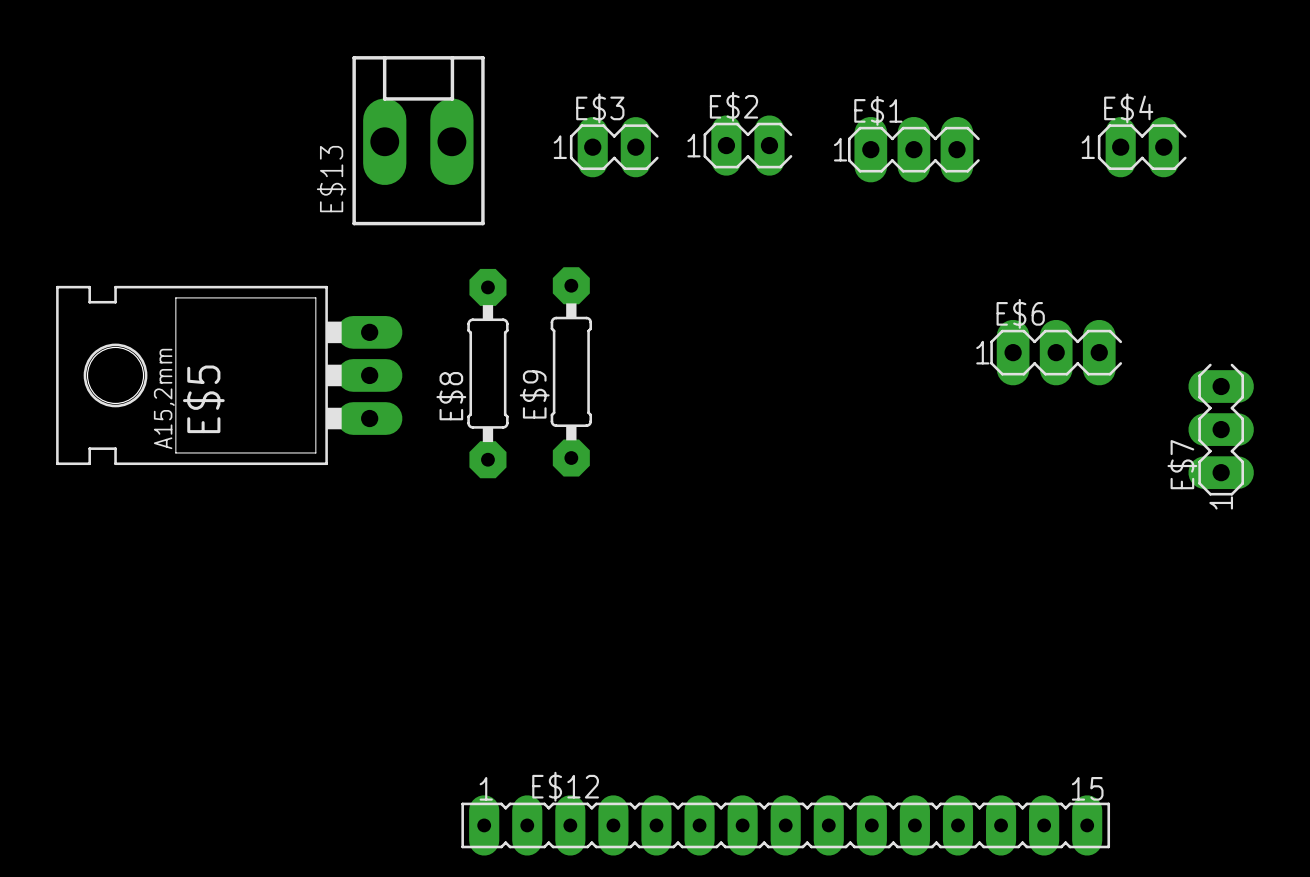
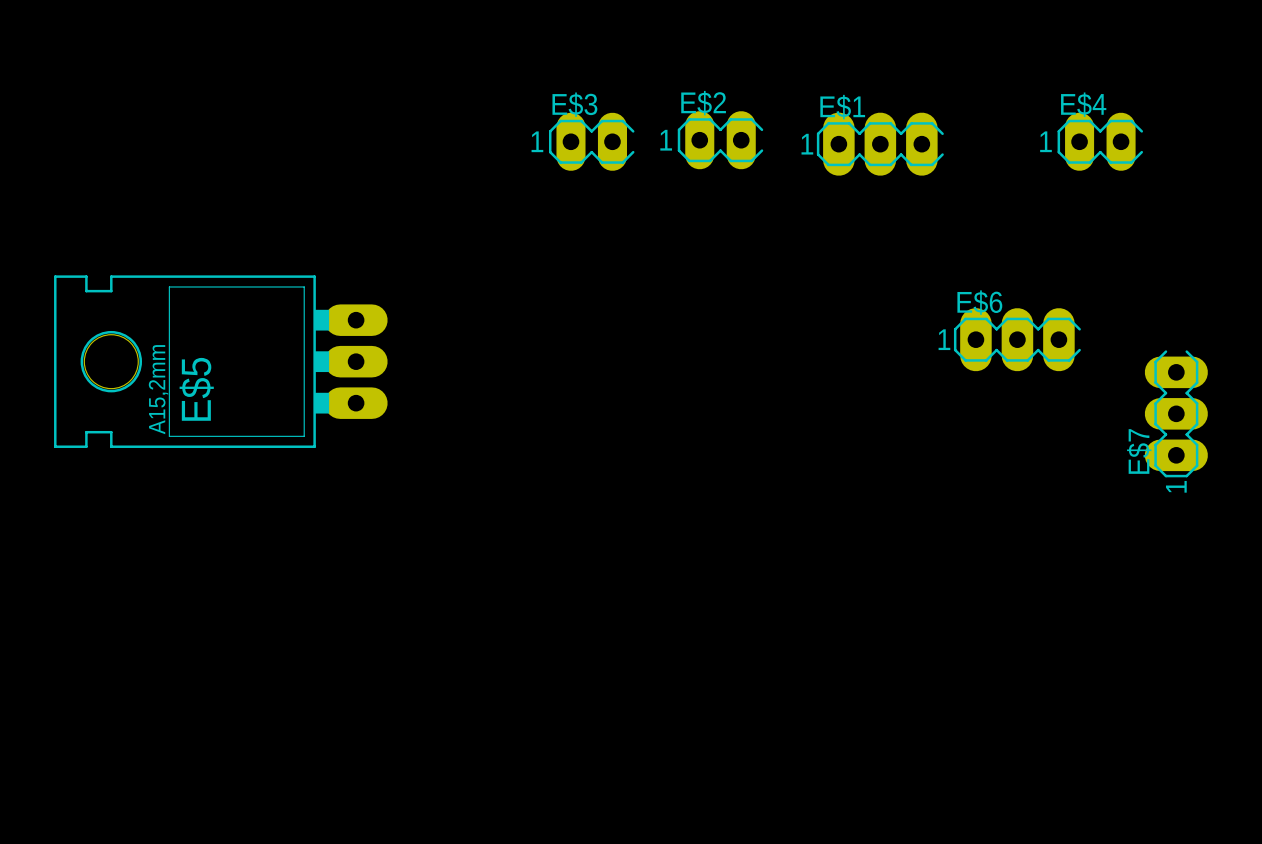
E$13: (418, 140) -> none
E$9: (571, 371) -> none
E$8: (487, 373) -> none
E$12: (785, 825) -> none

